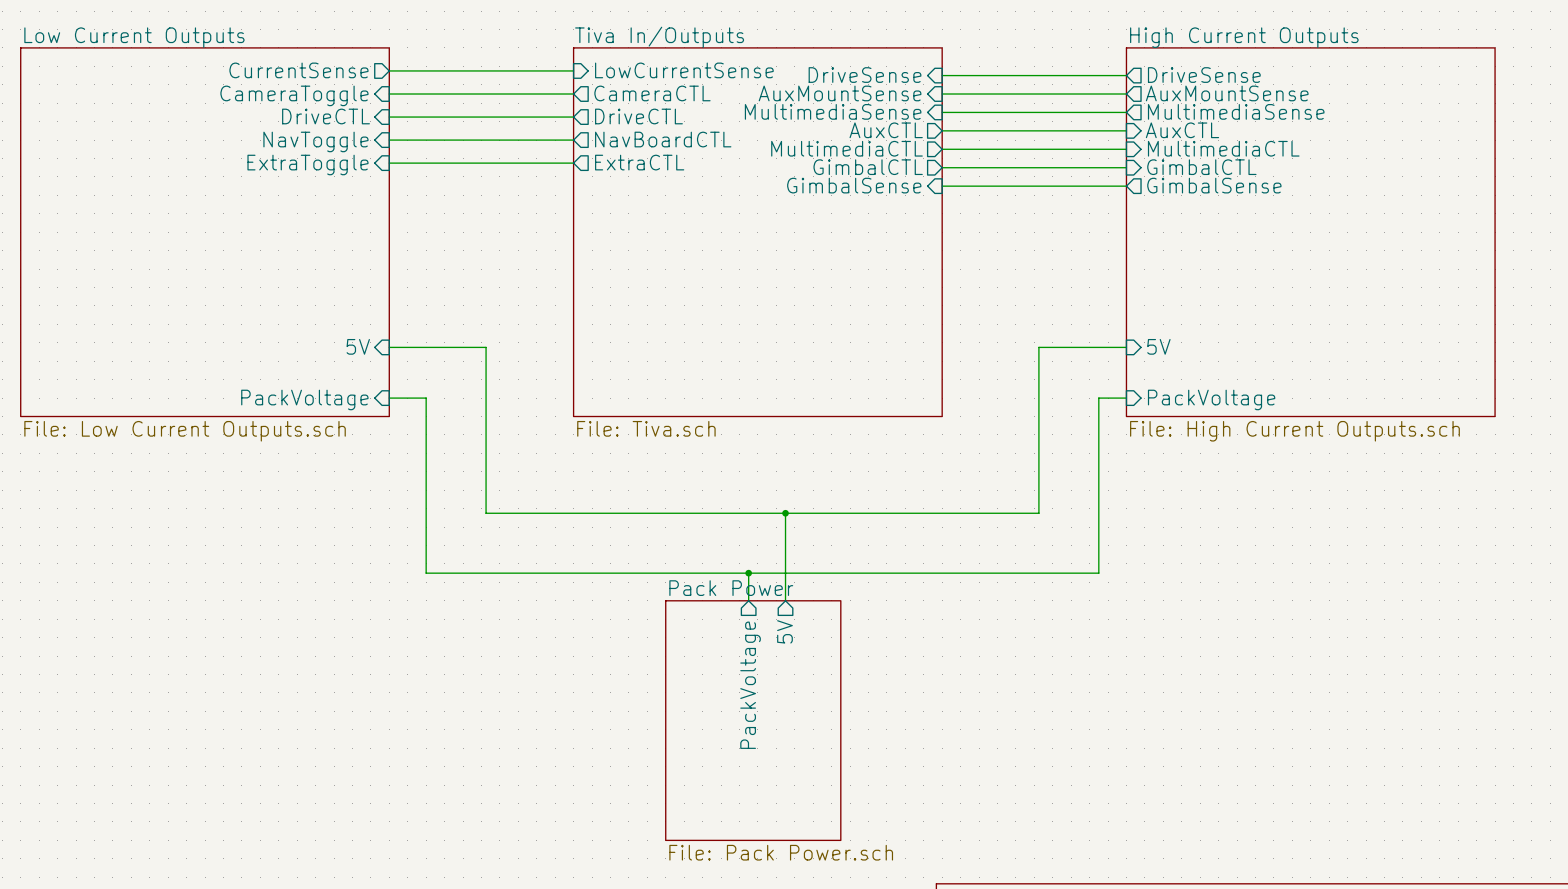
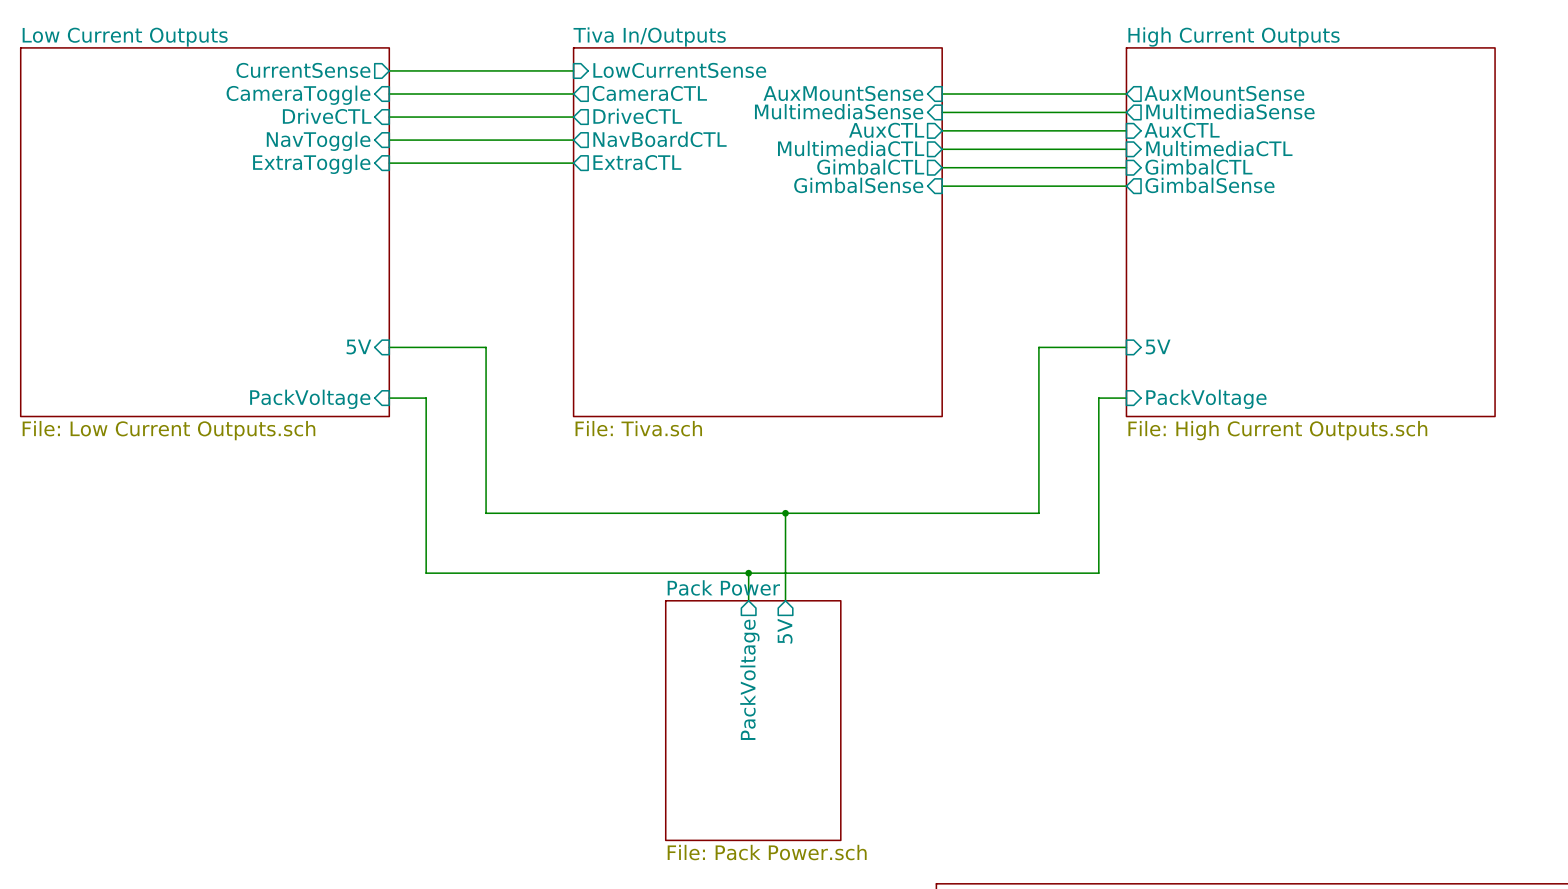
sheet pin: DriveSense (865, 75) -> none
wire: (942, 75) (1126, 75) -> none
sheet pin: DriveSense (1204, 75) -> none

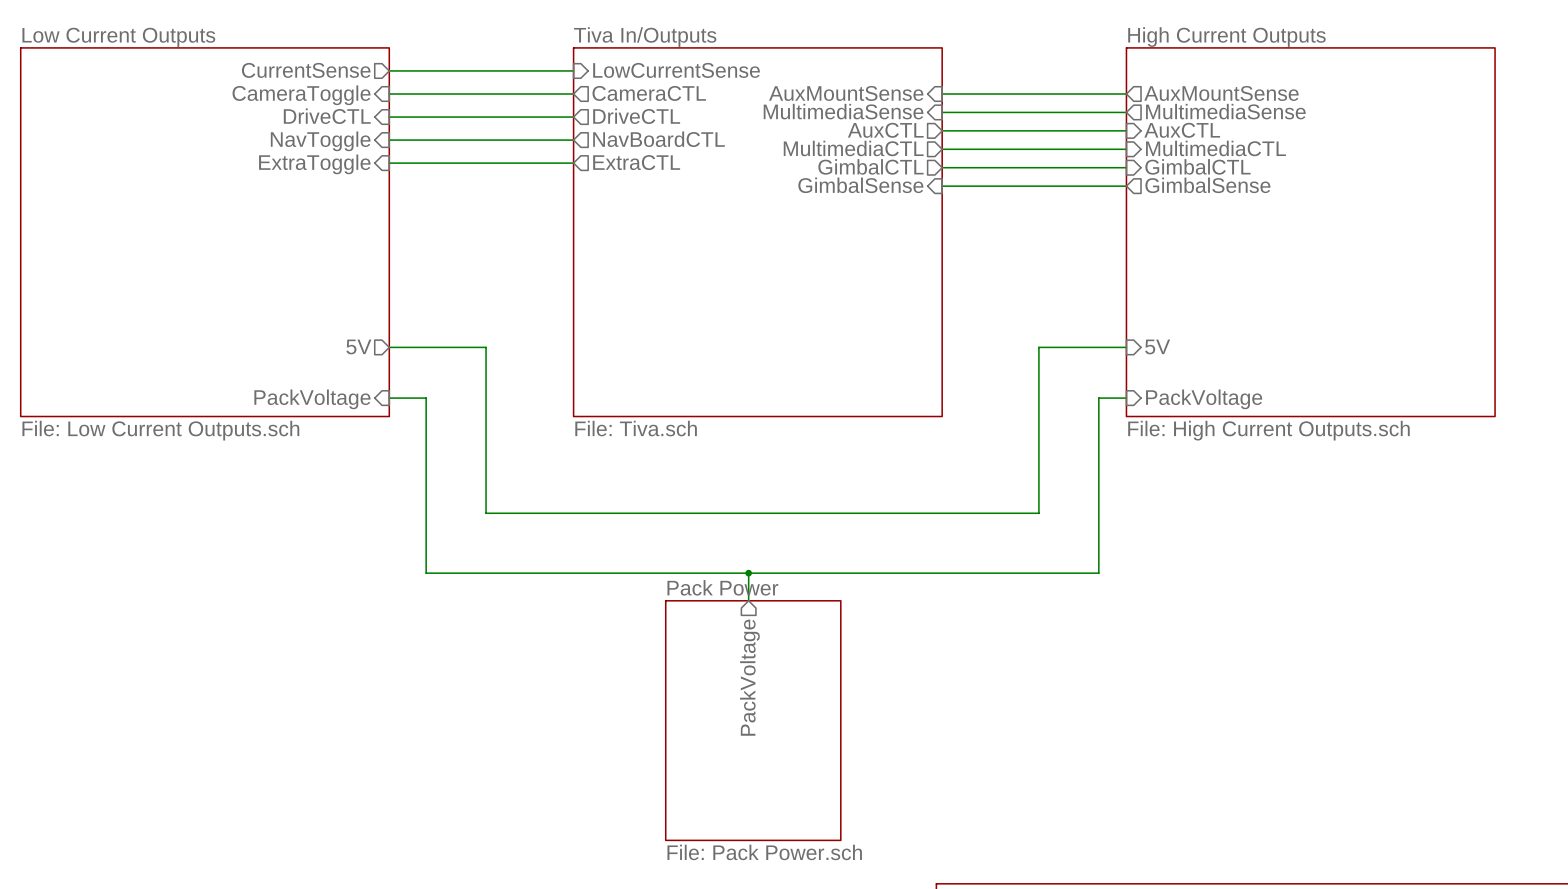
sheet pin shape: input (358, 347) -> output (358, 346)
wire: (785, 513) (785, 600) -> none
junction: (785, 513) -> none
sheet pin: 5V (785, 631) -> none

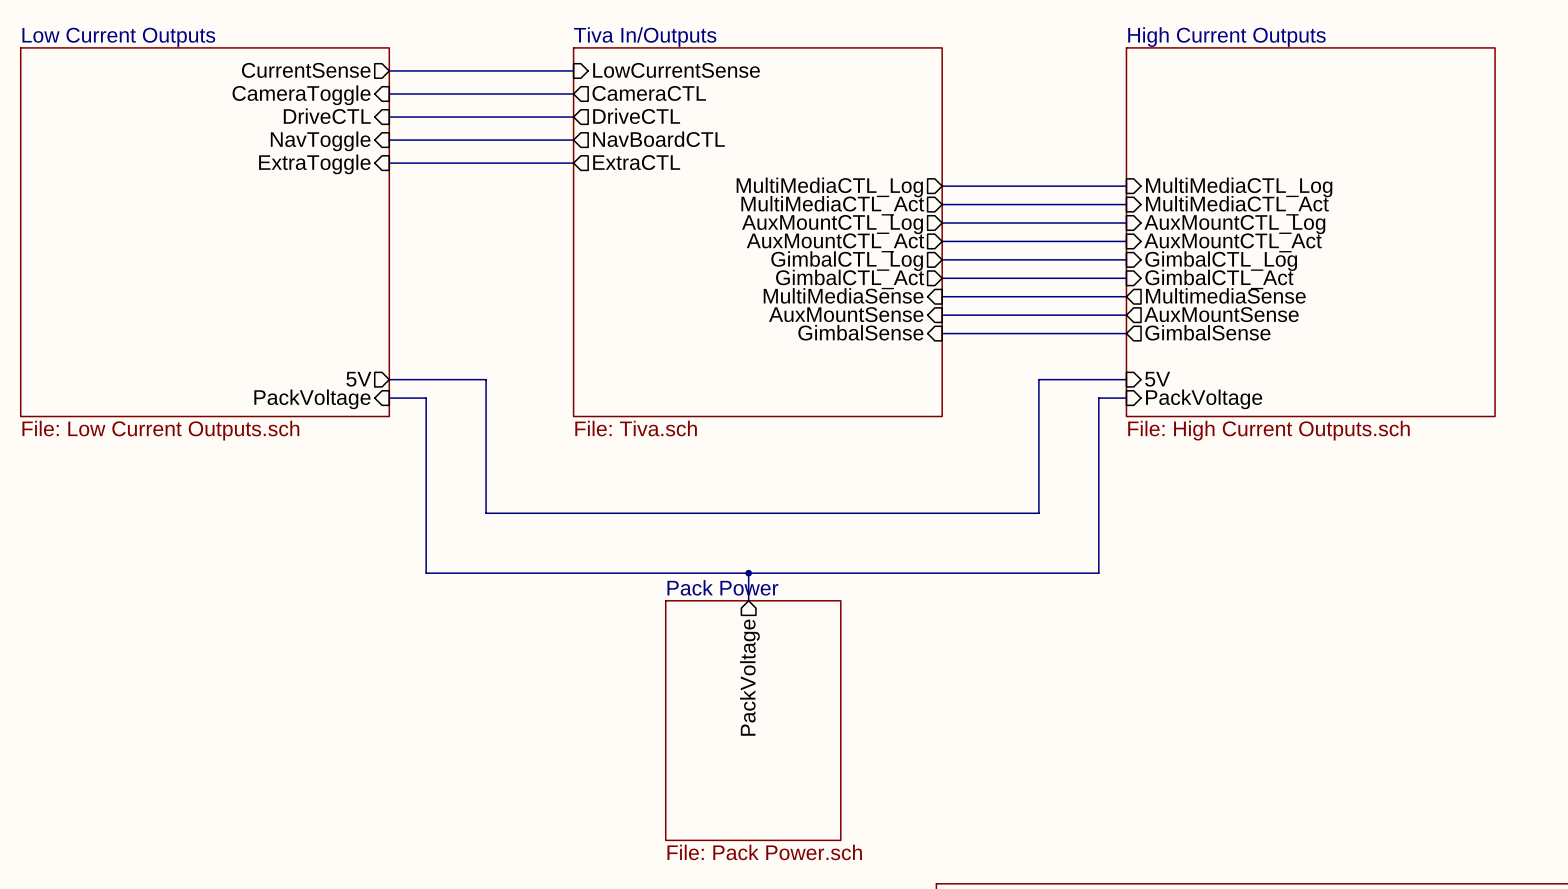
sheet pin: AuxMountSense (846, 93) -> none
sheet pin: AuxMountSense (1221, 93) -> none
wire: (942, 94) (1126, 94) -> (942, 204) (1126, 204)
sheet pin: MultimediaSense (843, 111) -> none
sheet pin: MultimediaSense (1225, 111) -> none
wire: (942, 112) (1126, 112) -> (942, 223) (1126, 223)
sheet pin: AuxCTL (885, 130) -> none
wire: (942, 130) (1126, 130) -> (942, 241) (1126, 241)
sheet pin: AuxCTL (1182, 130) -> none
sheet pin: MultimediaCTL (853, 148) -> none
sheet pin: MultimediaCTL (1215, 148) -> none
wire: (942, 149) (1126, 149) -> (942, 259) (1126, 259)
sheet pin: GimbalCTL (871, 166) -> none
sheet pin: GimbalCTL (1197, 166) -> none
wire: (942, 167) (1126, 167) -> (942, 278) (1126, 278)
sheet pin shape: input (860, 185) -> output (829, 187)
sheet pin: GimbalSense (860, 185) -> MultiMediaCTL_Log (829, 187)
sheet pin shape: output (1207, 185) -> input (1239, 187)
sheet pin: GimbalSense (1207, 185) -> MultiMediaCTL_Log (1239, 187)
sheet pin: none -> MultiMediaCTL_Act (832, 205)
sheet pin: none -> MultiMediaCTL_Act (1237, 205)
sheet pin: none -> AuxMountCTL_Log (832, 224)
sheet pin: none -> AuxMountCTL_Log (1234, 224)
sheet pin: none -> AuxMountCTL_Act (835, 242)
sheet pin: none -> AuxMountCTL_Act (1233, 242)
sheet pin: none -> GimbalCTL_Log (847, 261)
sheet pin: none -> GimbalCTL_Log (1221, 261)
sheet pin: none -> GimbalCTL_Act (850, 279)
sheet pin: none -> GimbalCTL_Act (1219, 279)
sheet pin: none -> MultiMediaSense (843, 295)
sheet pin: none -> MultimediaSense (1225, 295)
wire: none -> (942, 296) (1126, 296)
sheet pin: none -> AuxMountSense (846, 314)
sheet pin: none -> AuxMountSense (1221, 314)
wire: none -> (942, 315) (1126, 315)
sheet pin: none -> GimbalSense (860, 332)
sheet pin: none -> GimbalSense (1207, 332)
wire: none -> (942, 333) (1126, 333)
sheet pin position: 5V (358, 346) -> 5V (358, 379)
sheet pin position: 5V (1157, 346) -> 5V (1157, 379)
wire: (389, 347) (486, 347) (486, 379) -> (389, 379) (486, 379)
wire: (1126, 347) (1038, 347) (1038, 379) -> (1126, 379) (1038, 379)

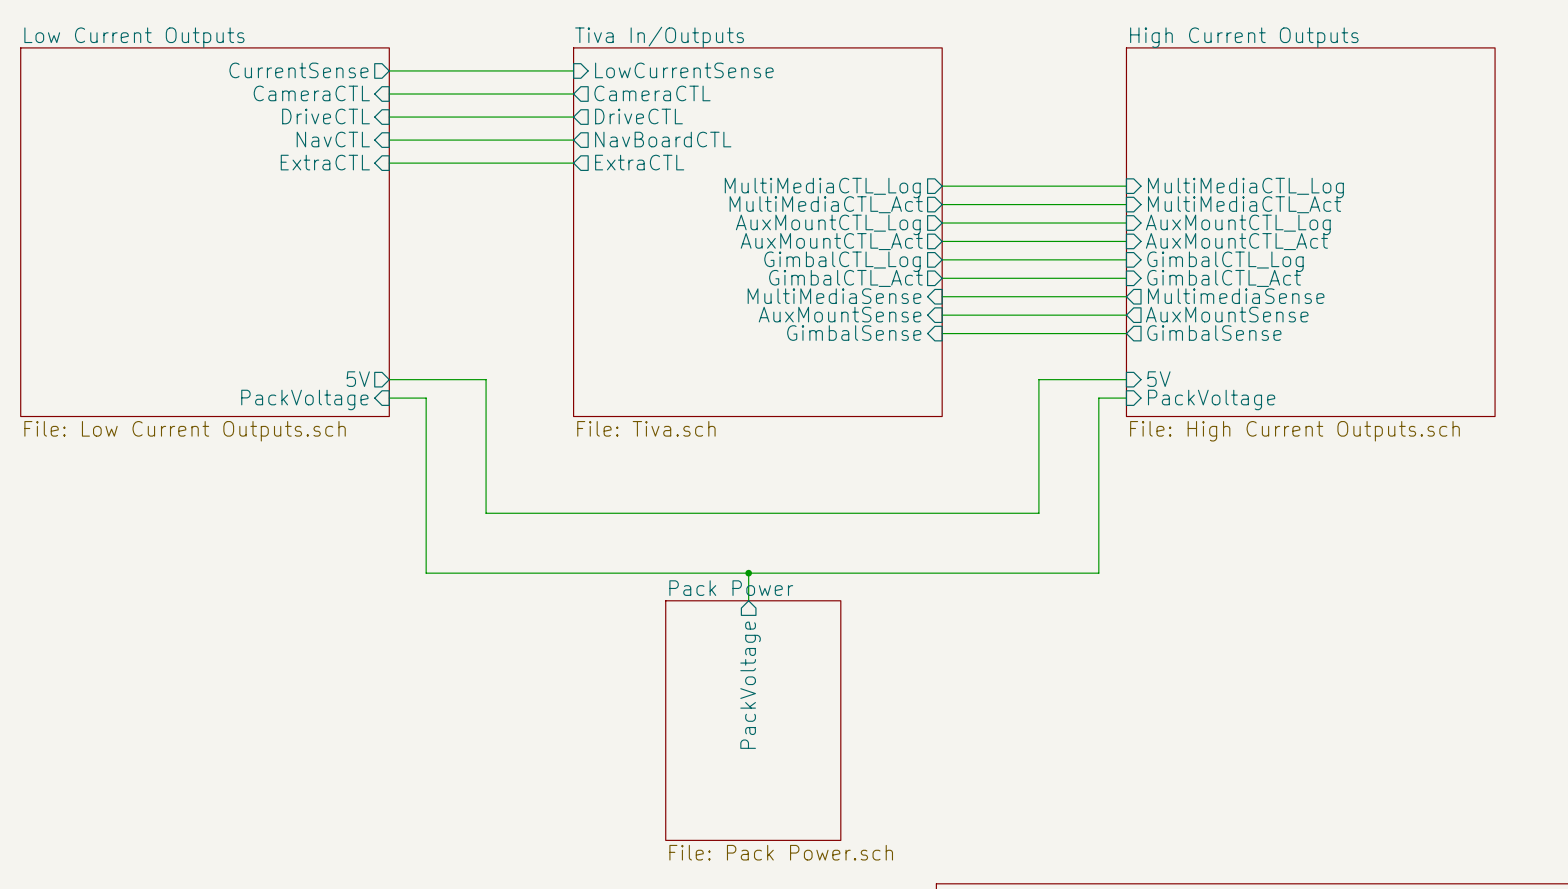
sheet pin: CameraToggle (301, 95) -> CameraCTL (311, 93)
sheet pin: NavToggle (320, 141) -> NavCTL (333, 139)
sheet pin: ExtraToggle (314, 164) -> ExtraCTL (325, 162)

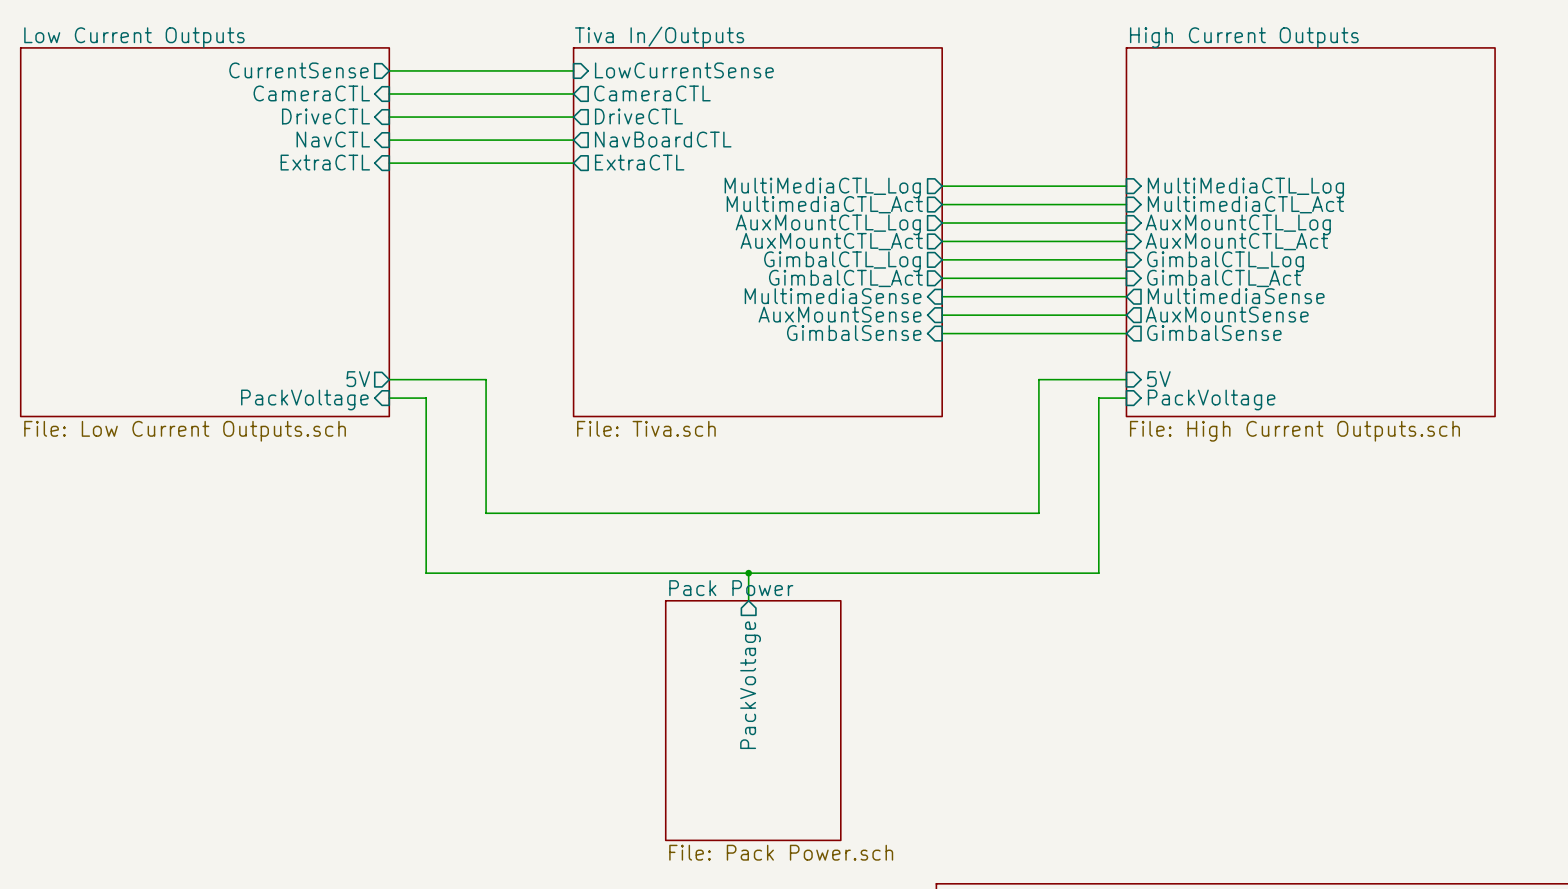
sheet pin: MultiMediaCTL_Act (826, 204) -> MultimediaCTL_Act (824, 204)
sheet pin: MultiMediaCTL_Act (1244, 204) -> MultimediaCTL_Act (1245, 204)
sheet pin: MultiMediaSense (834, 296) -> MultimediaSense (833, 296)

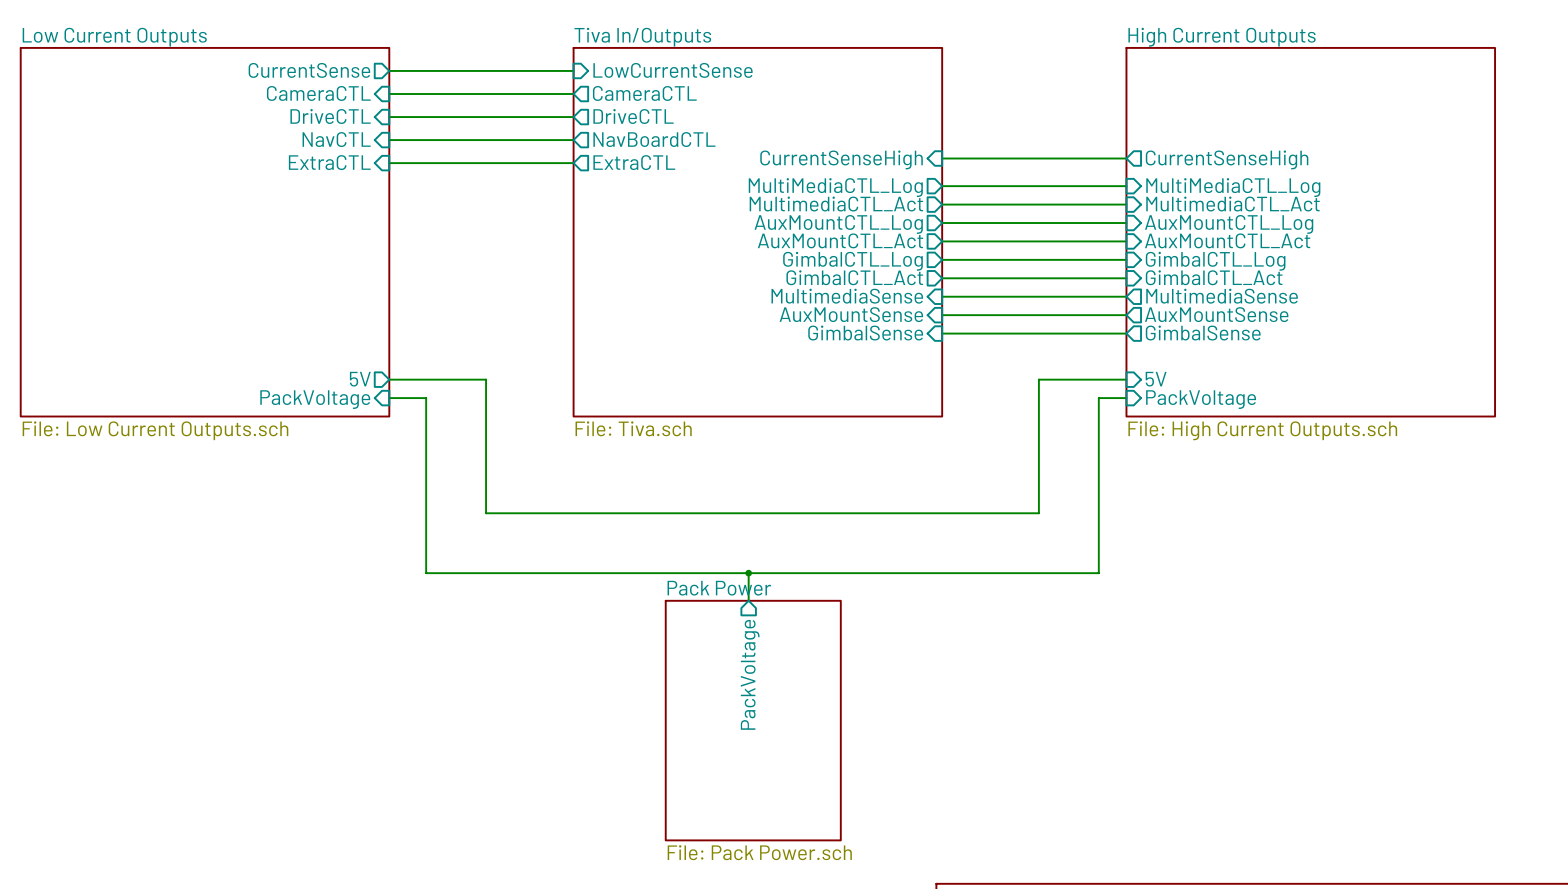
wire: none -> (942, 158) (1126, 158)
sheet pin: none -> CurrentSenseHigh (841, 159)
sheet pin: none -> CurrentSenseHigh (1227, 159)

